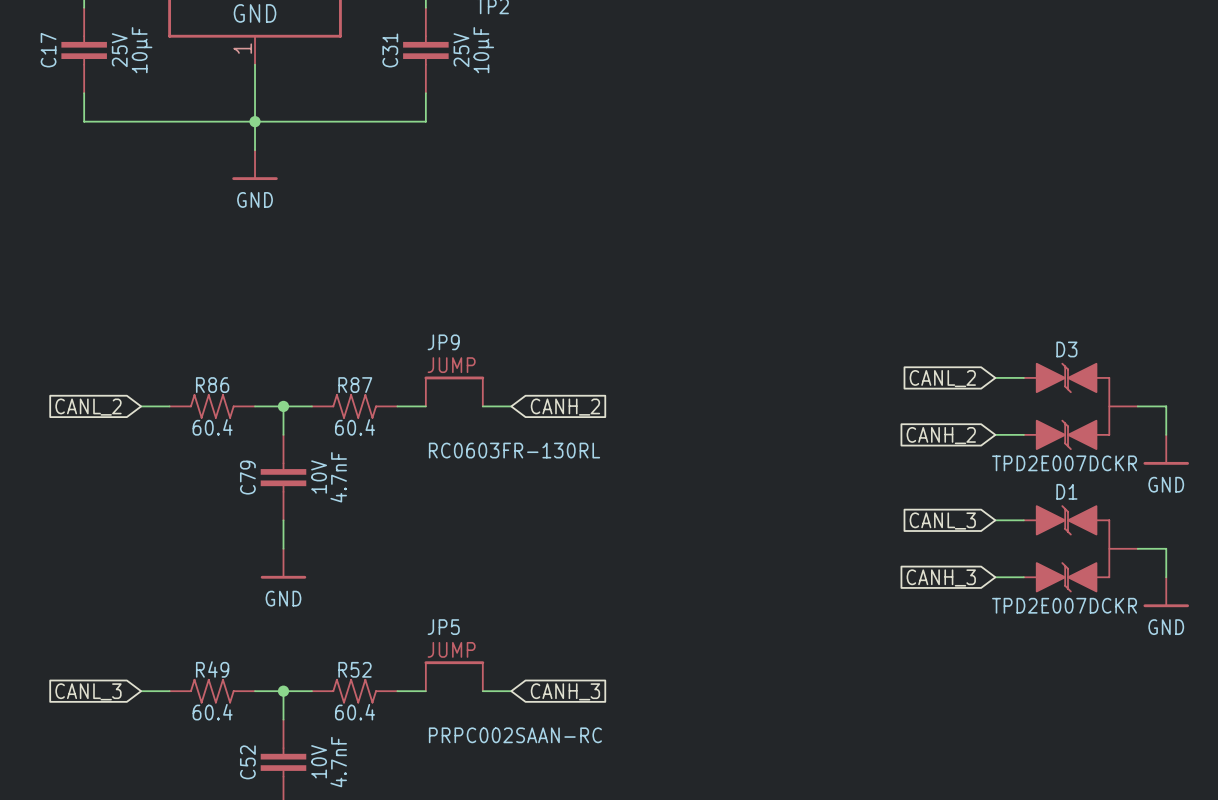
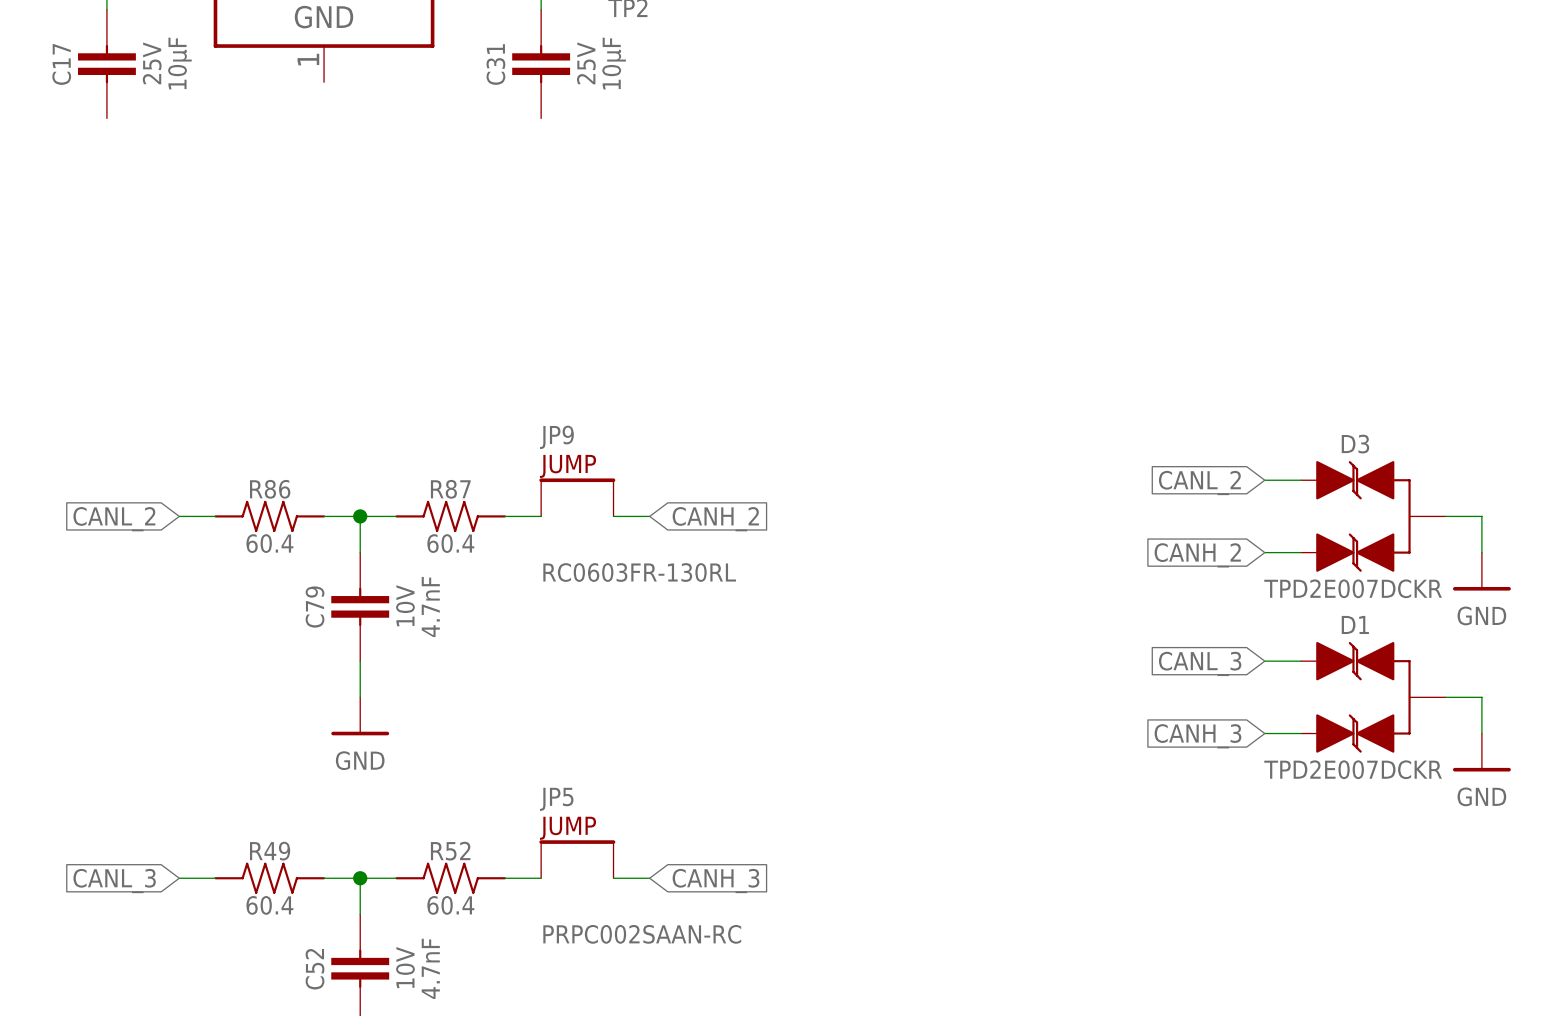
wire: (255, 64) (255, 150) -> none
wire: (84, 93) (84, 121) (425, 121) (425, 93) -> none
junction: (255, 121) -> none
power symbol: GND (255, 165) -> none

